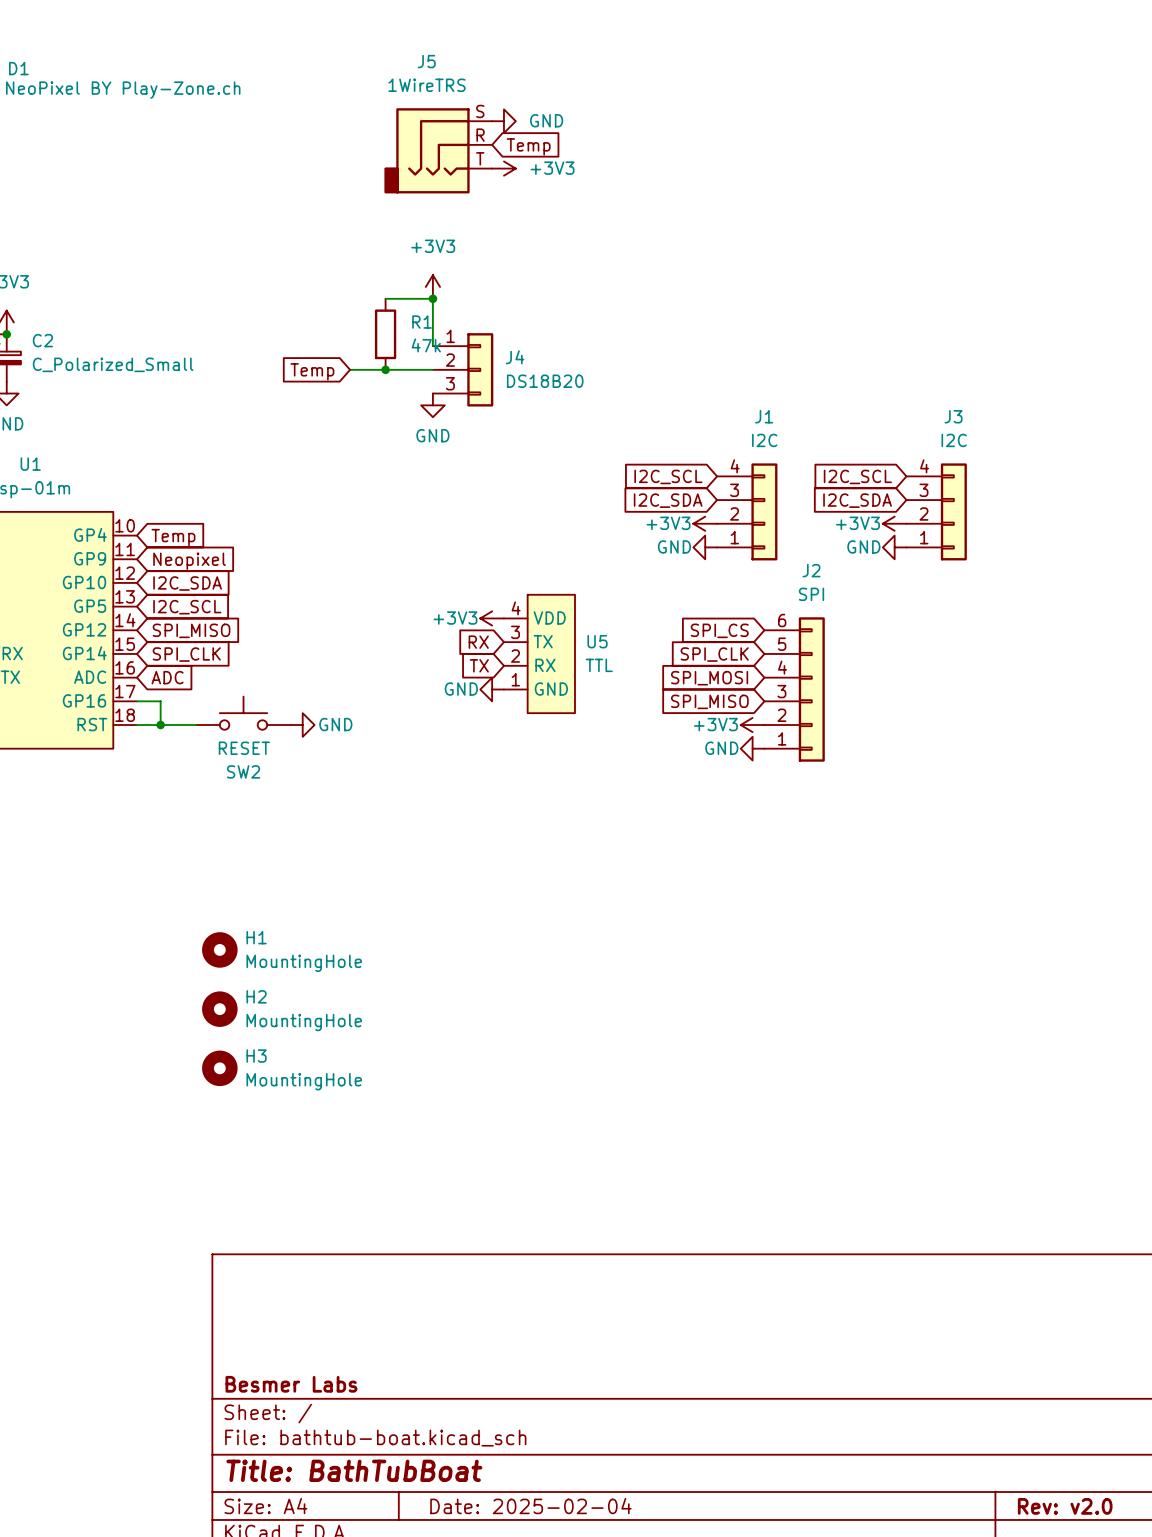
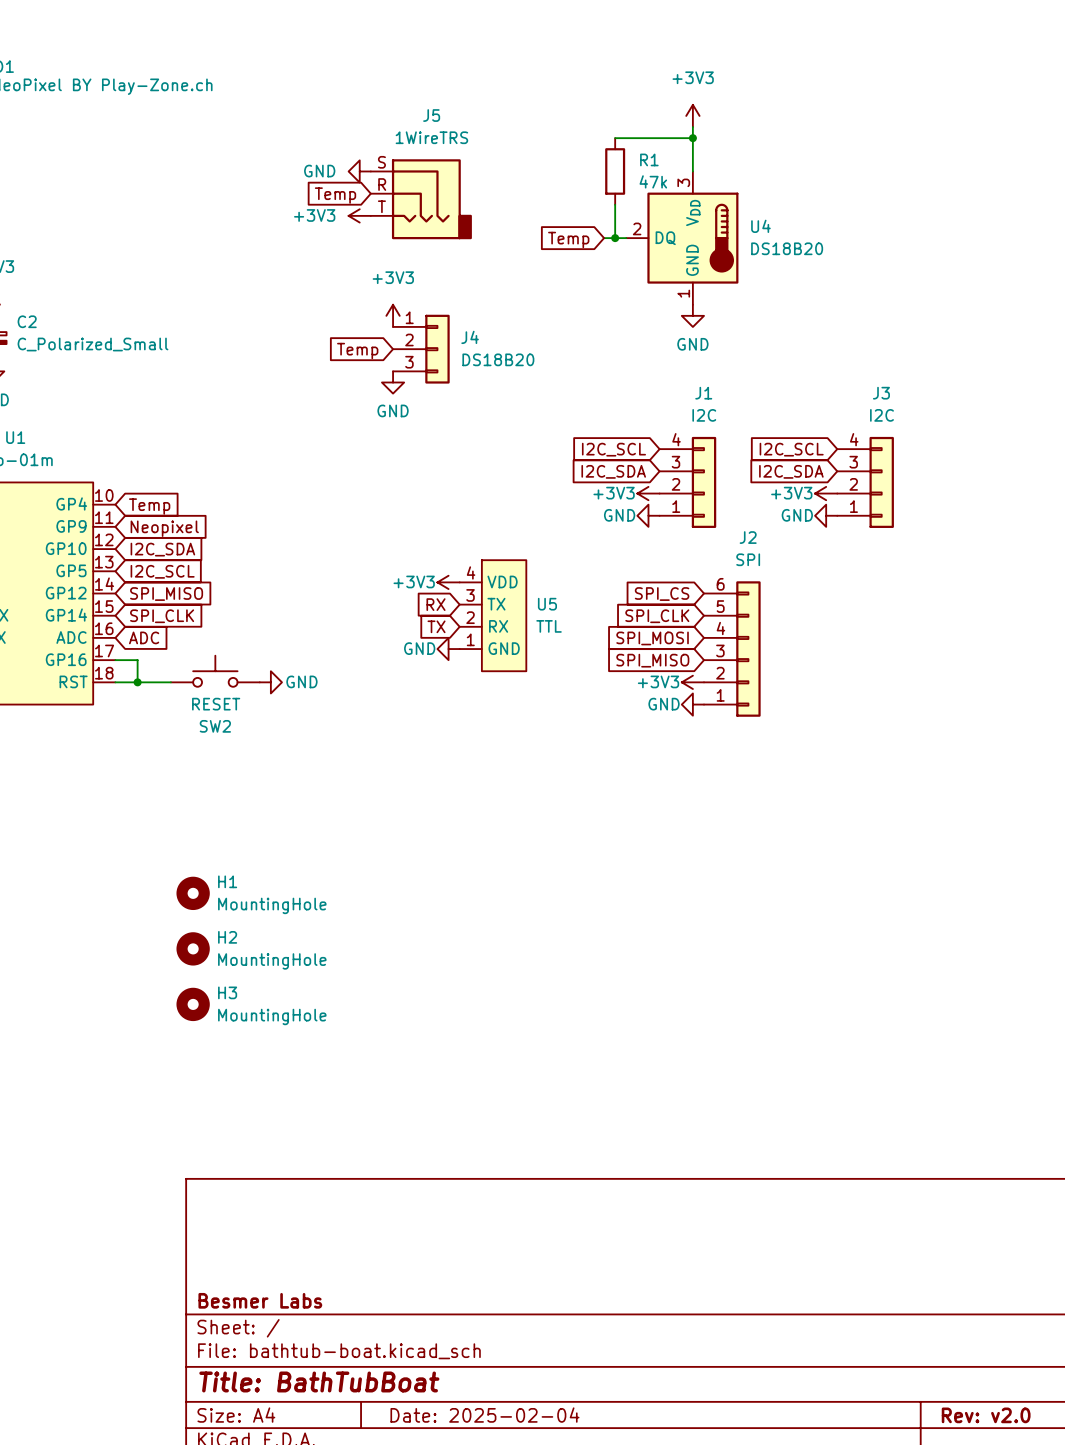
power symbol rotation: 0° (503, 121) -> 180° (359, 171)
power symbol position: GND (503, 121) -> GND (359, 171)
power symbol: none -> +3V3 (692, 115)
wire: none -> (692, 127) (692, 171)
wire: none -> (615, 138) (692, 138)
junction: none -> (692, 138)
global label: Temp (528, 146) -> none
J5 flip: as is (427, 150) -> left-right (431, 199)
power symbol: +3V3 (503, 168) -> none
global label: none -> Temp (335, 195)
wire: none -> (615, 204) (615, 238)
power symbol: none -> +3V3 (359, 215)
wire: none -> (604, 238) (626, 238)
junction: none -> (615, 238)
U4: none -> DS18B20 (682, 238)
global label: none -> Temp (568, 239)
power symbol: +3V3 (432, 286) -> none
wire: (385, 298) (432, 298) (432, 346) -> none
junction: (432, 298) -> none
R1 position: (385, 334) -> (615, 171)
power symbol: none -> +3V3 (393, 315)
power symbol: none -> GND (692, 315)
wire: (350, 369) (432, 369) -> none
junction: (385, 369) -> none
global label position: Temp (312, 371) -> Temp (357, 351)

